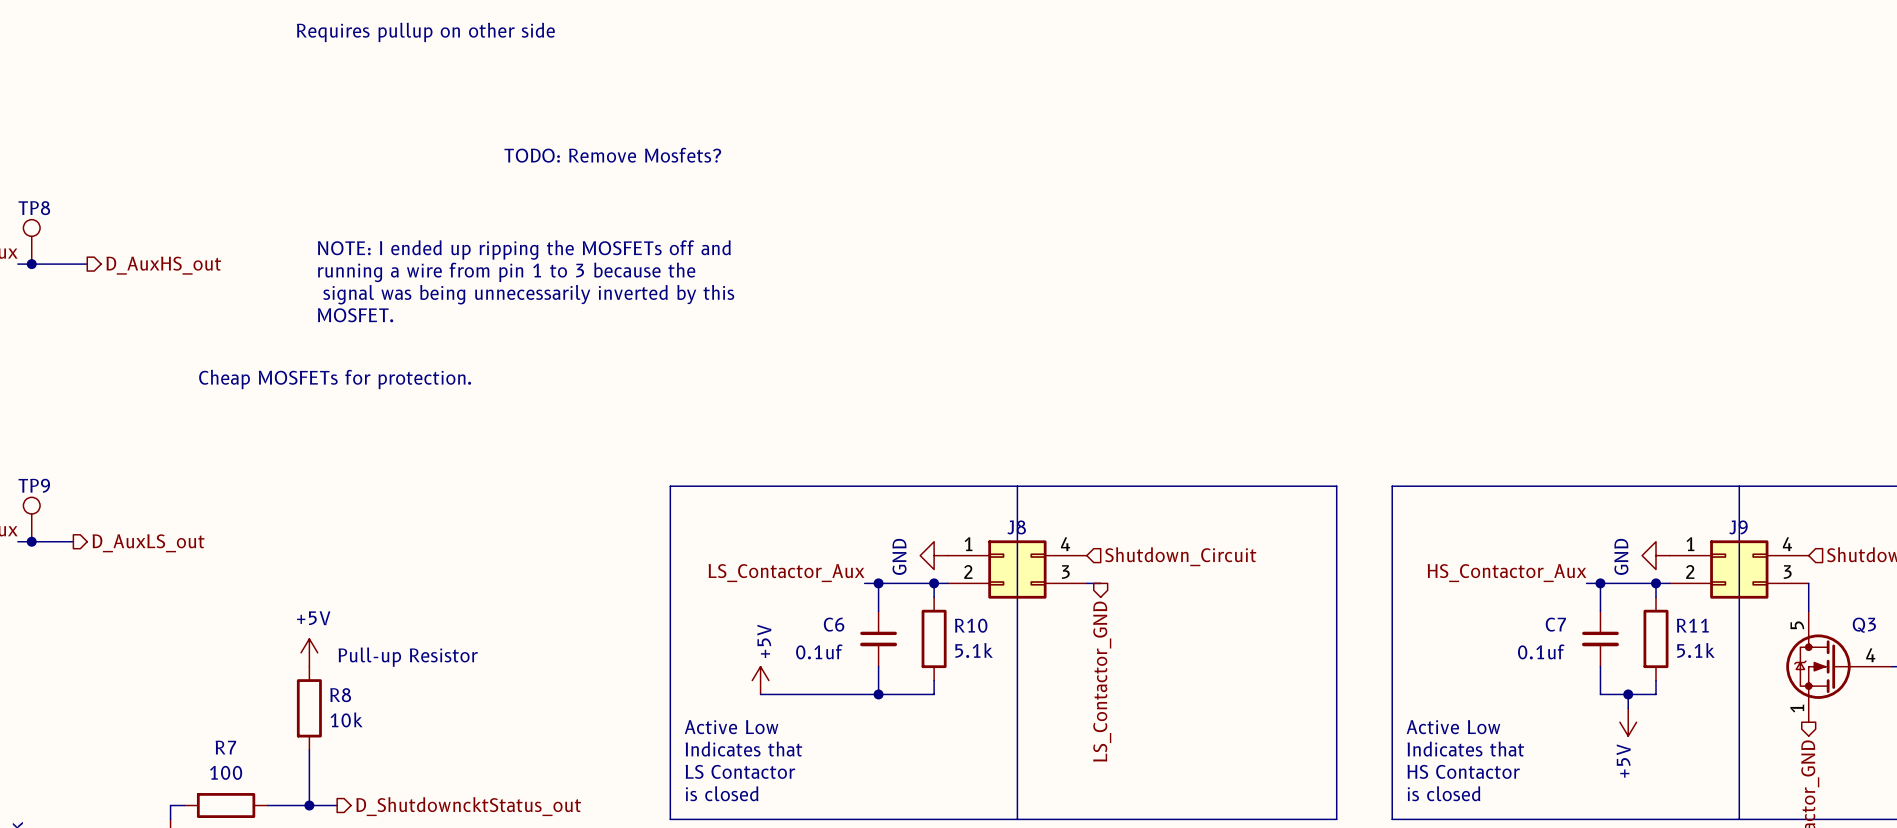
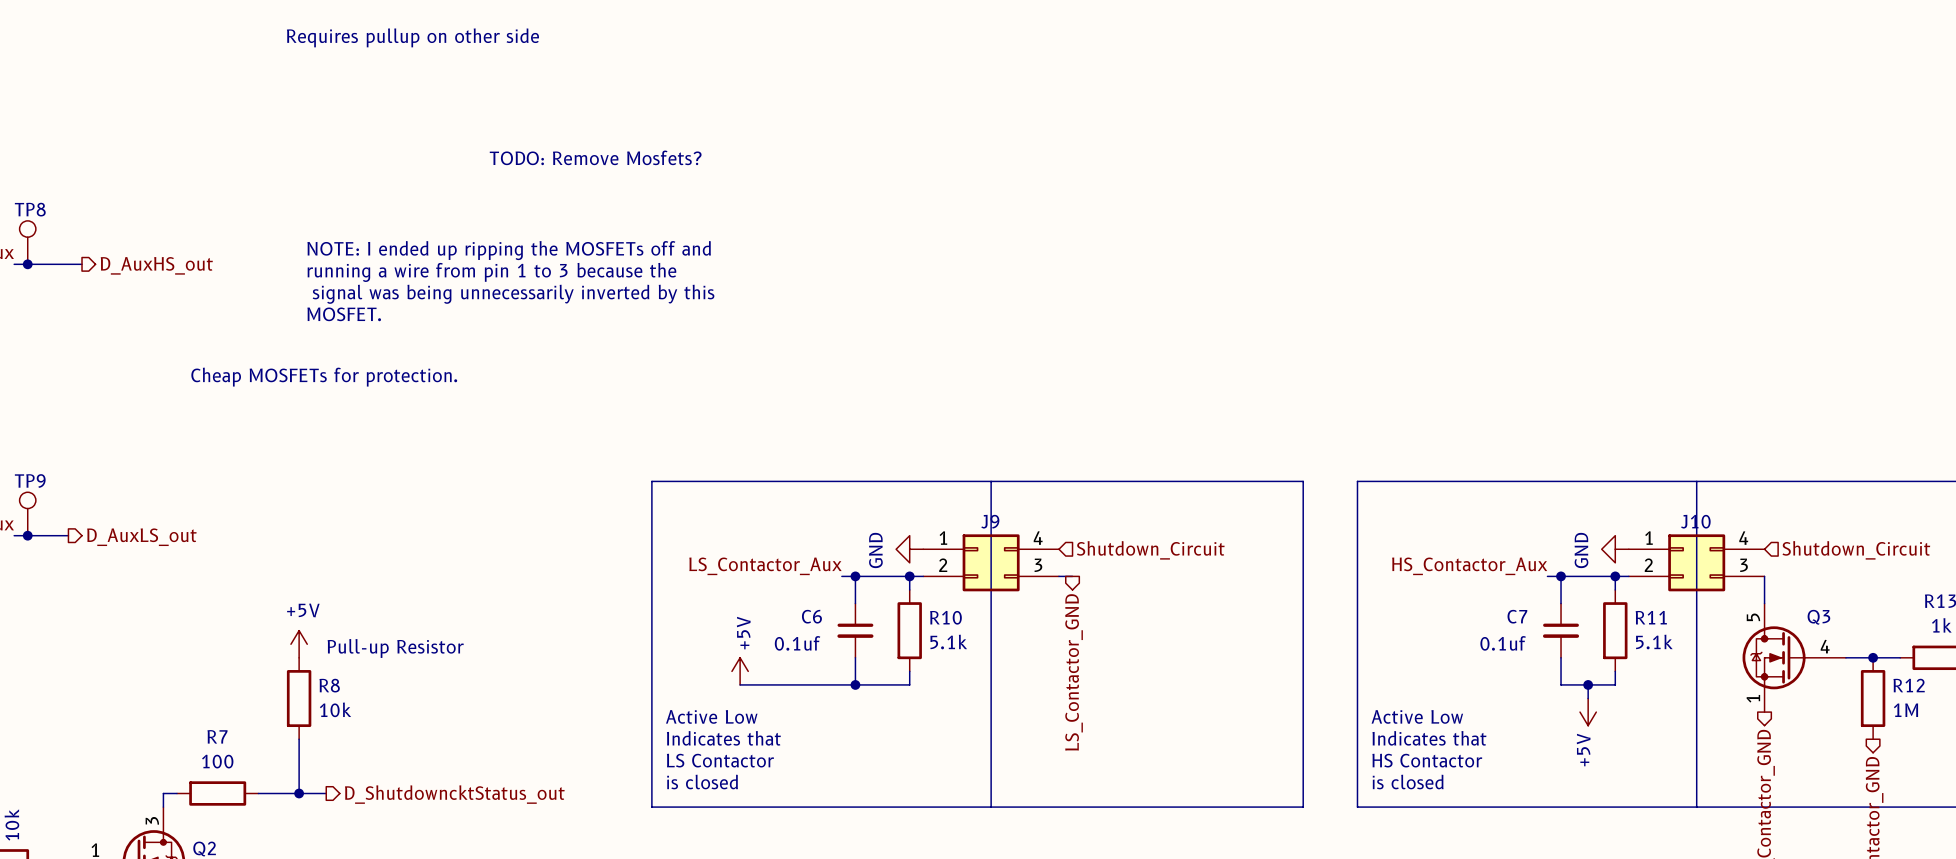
J8 name: J8 (1016, 527) -> J9 (990, 521)
J9 name: J9 (1738, 527) -> J10 (1695, 521)

